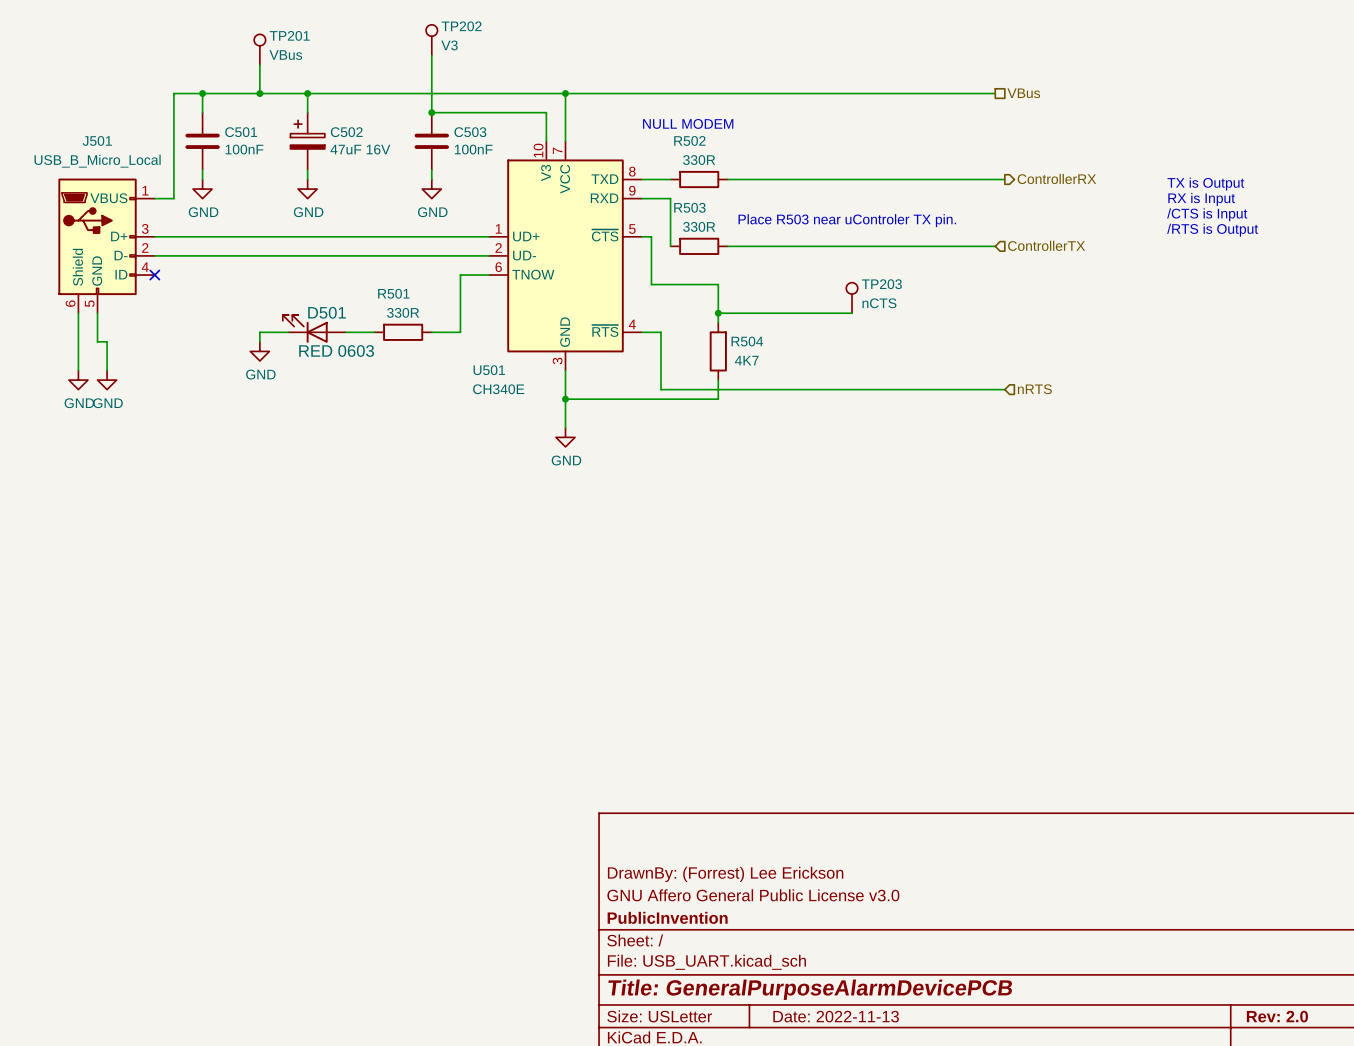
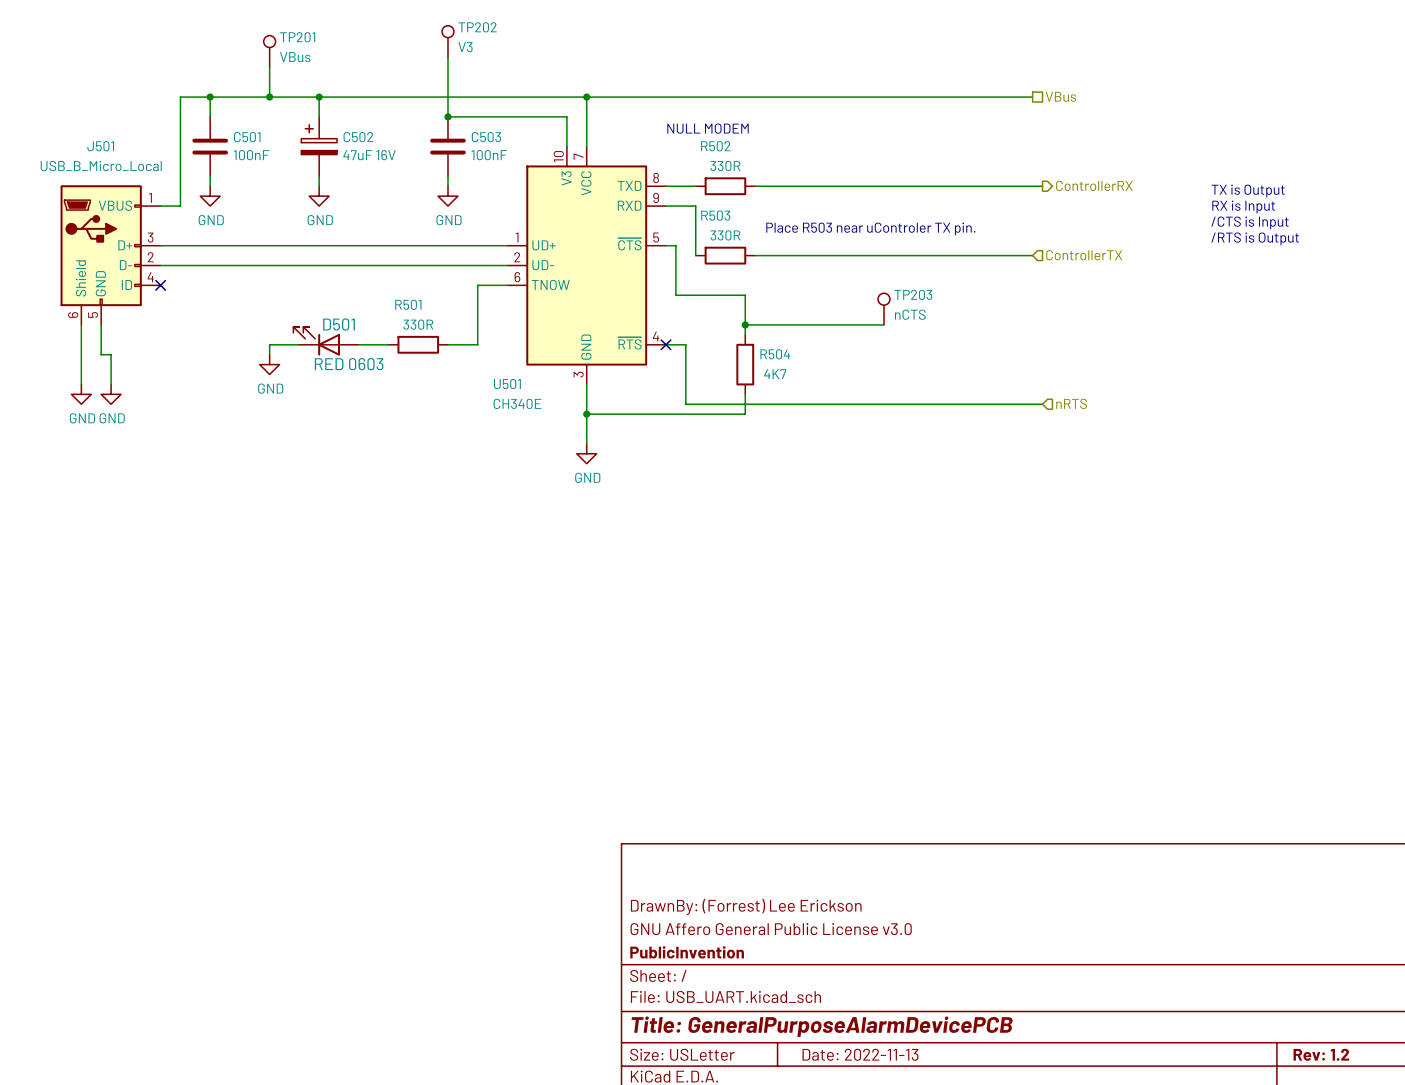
no-connect mark: none -> (665, 344)
title block: Rev: 2.0 (1277, 1016) -> Rev: 1.2 (1321, 1054)

